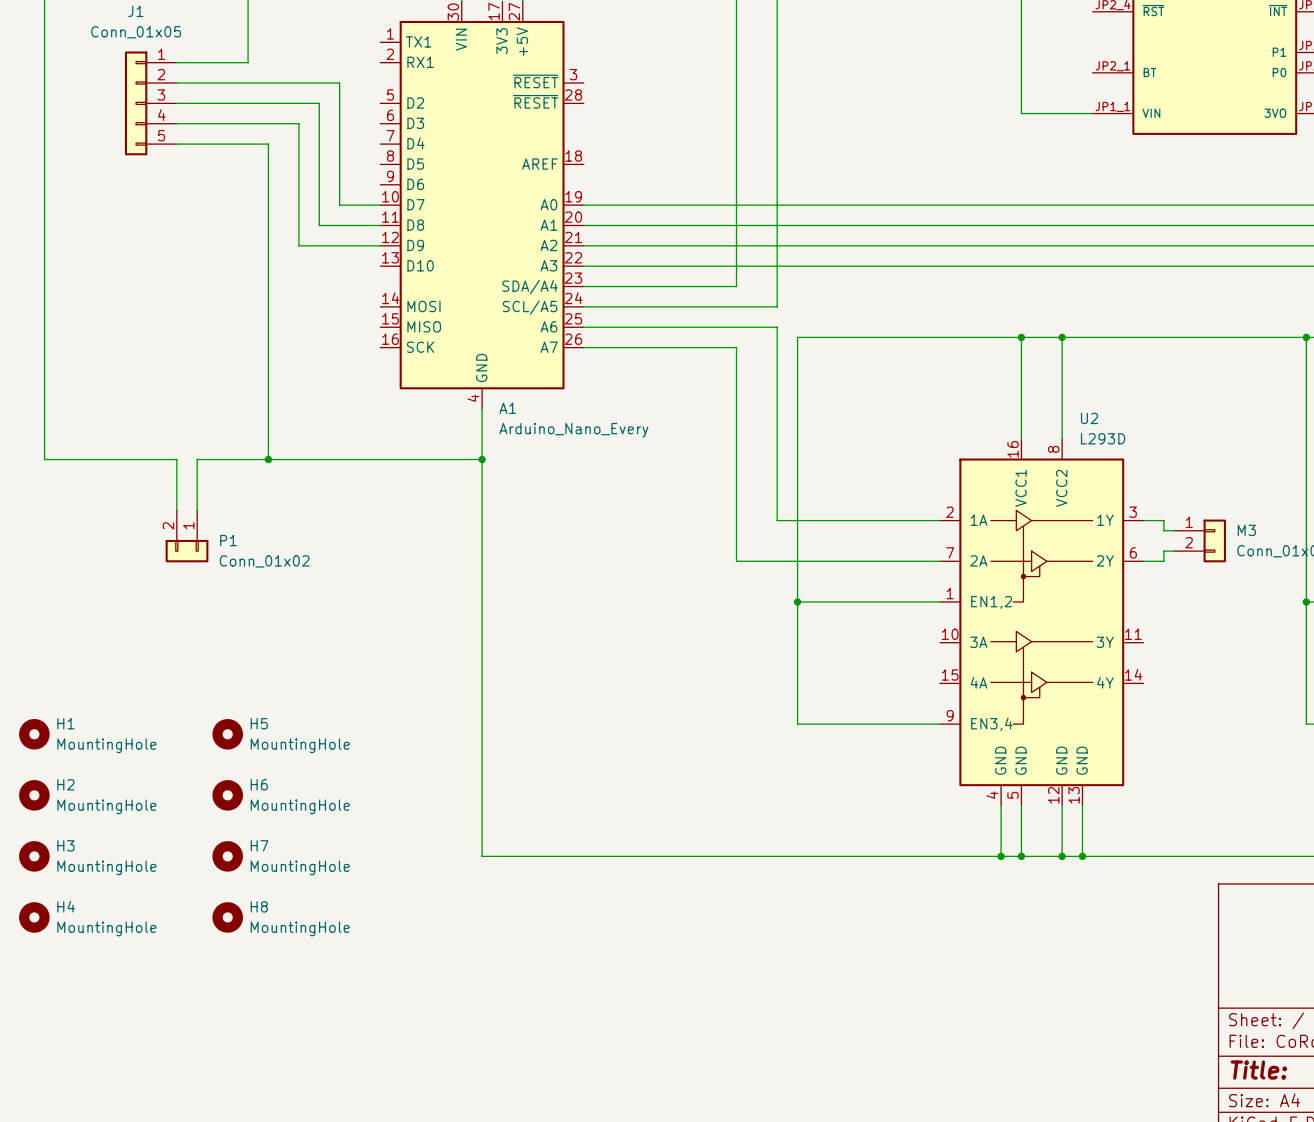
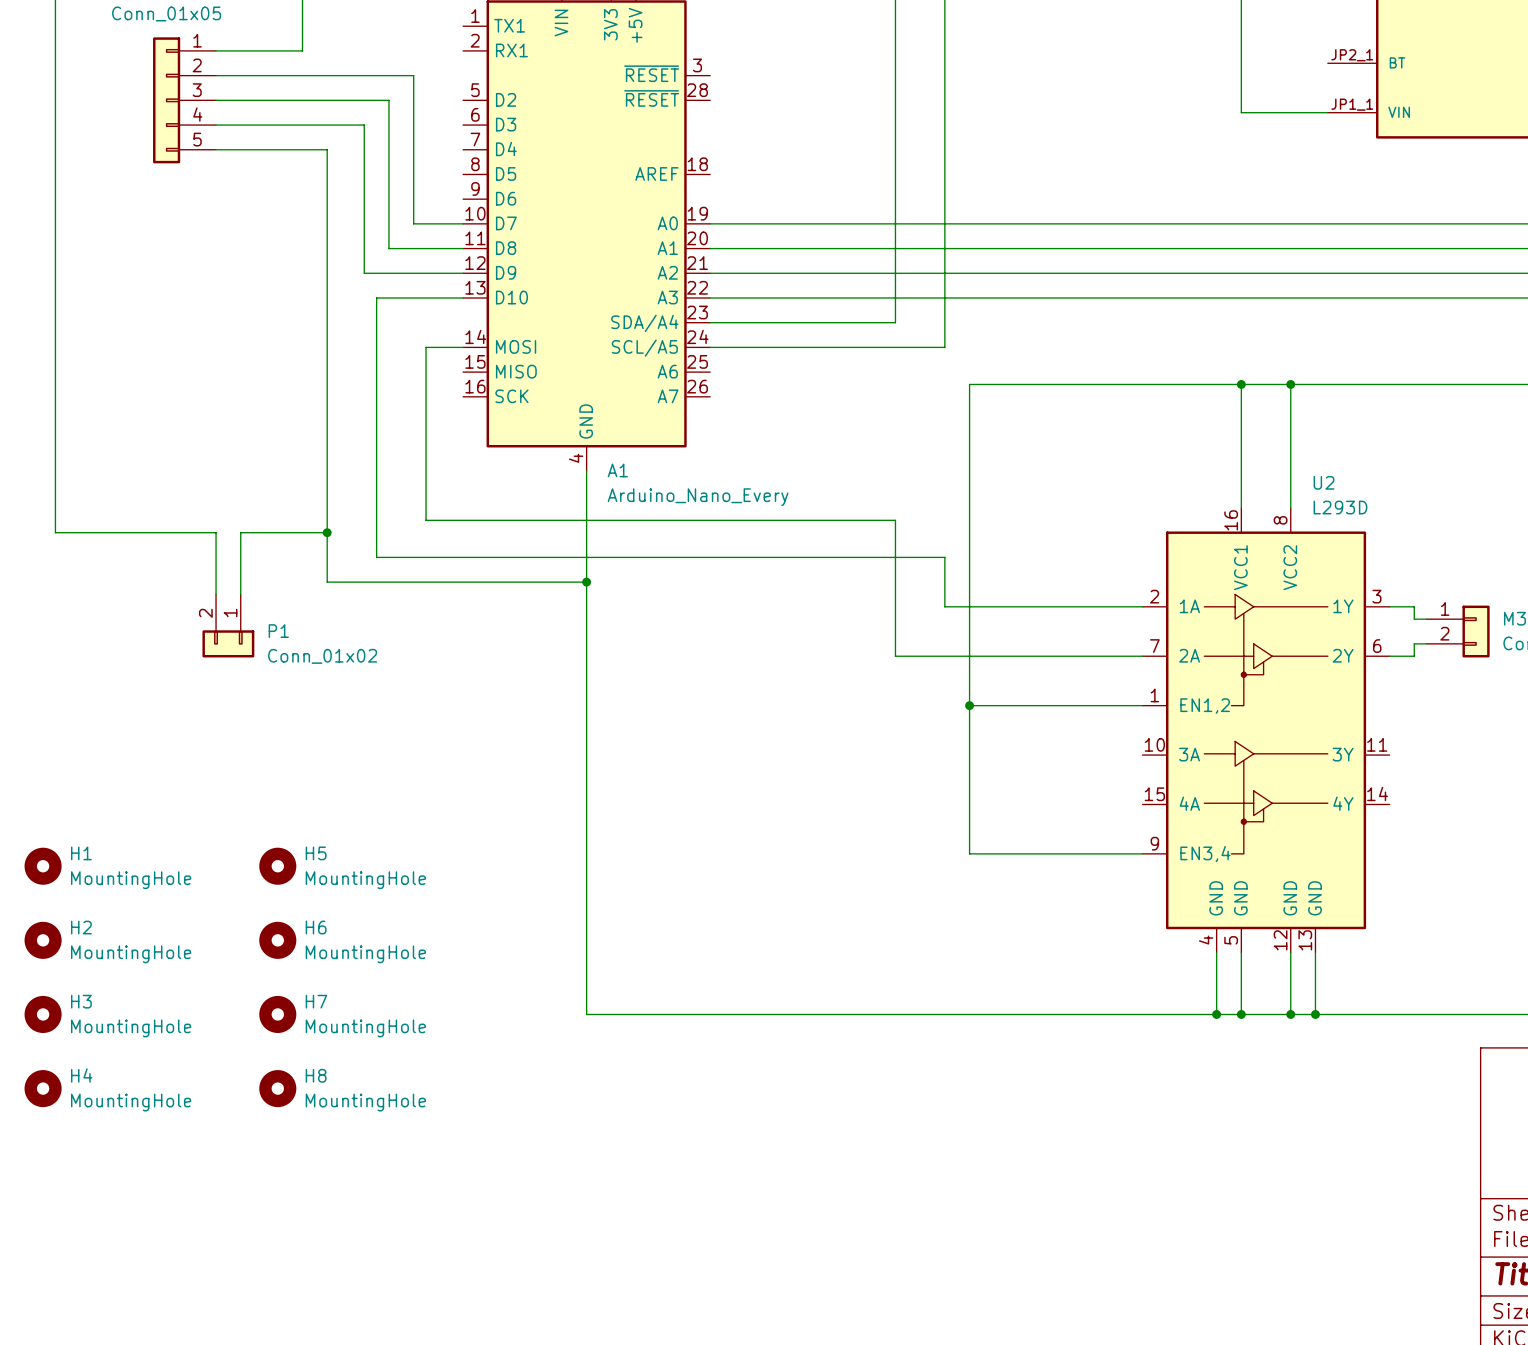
wire: (583, 327) (777, 327) (777, 479) -> (463, 297) (376, 297) (376, 557) (944, 557)
wire: (583, 347) (736, 347) (736, 449) -> (463, 347) (426, 347) (426, 520) (895, 520)
wire: (268, 459) (482, 459) -> (327, 532) (327, 582) (586, 582)
junction position: (482, 459) -> (586, 582)

